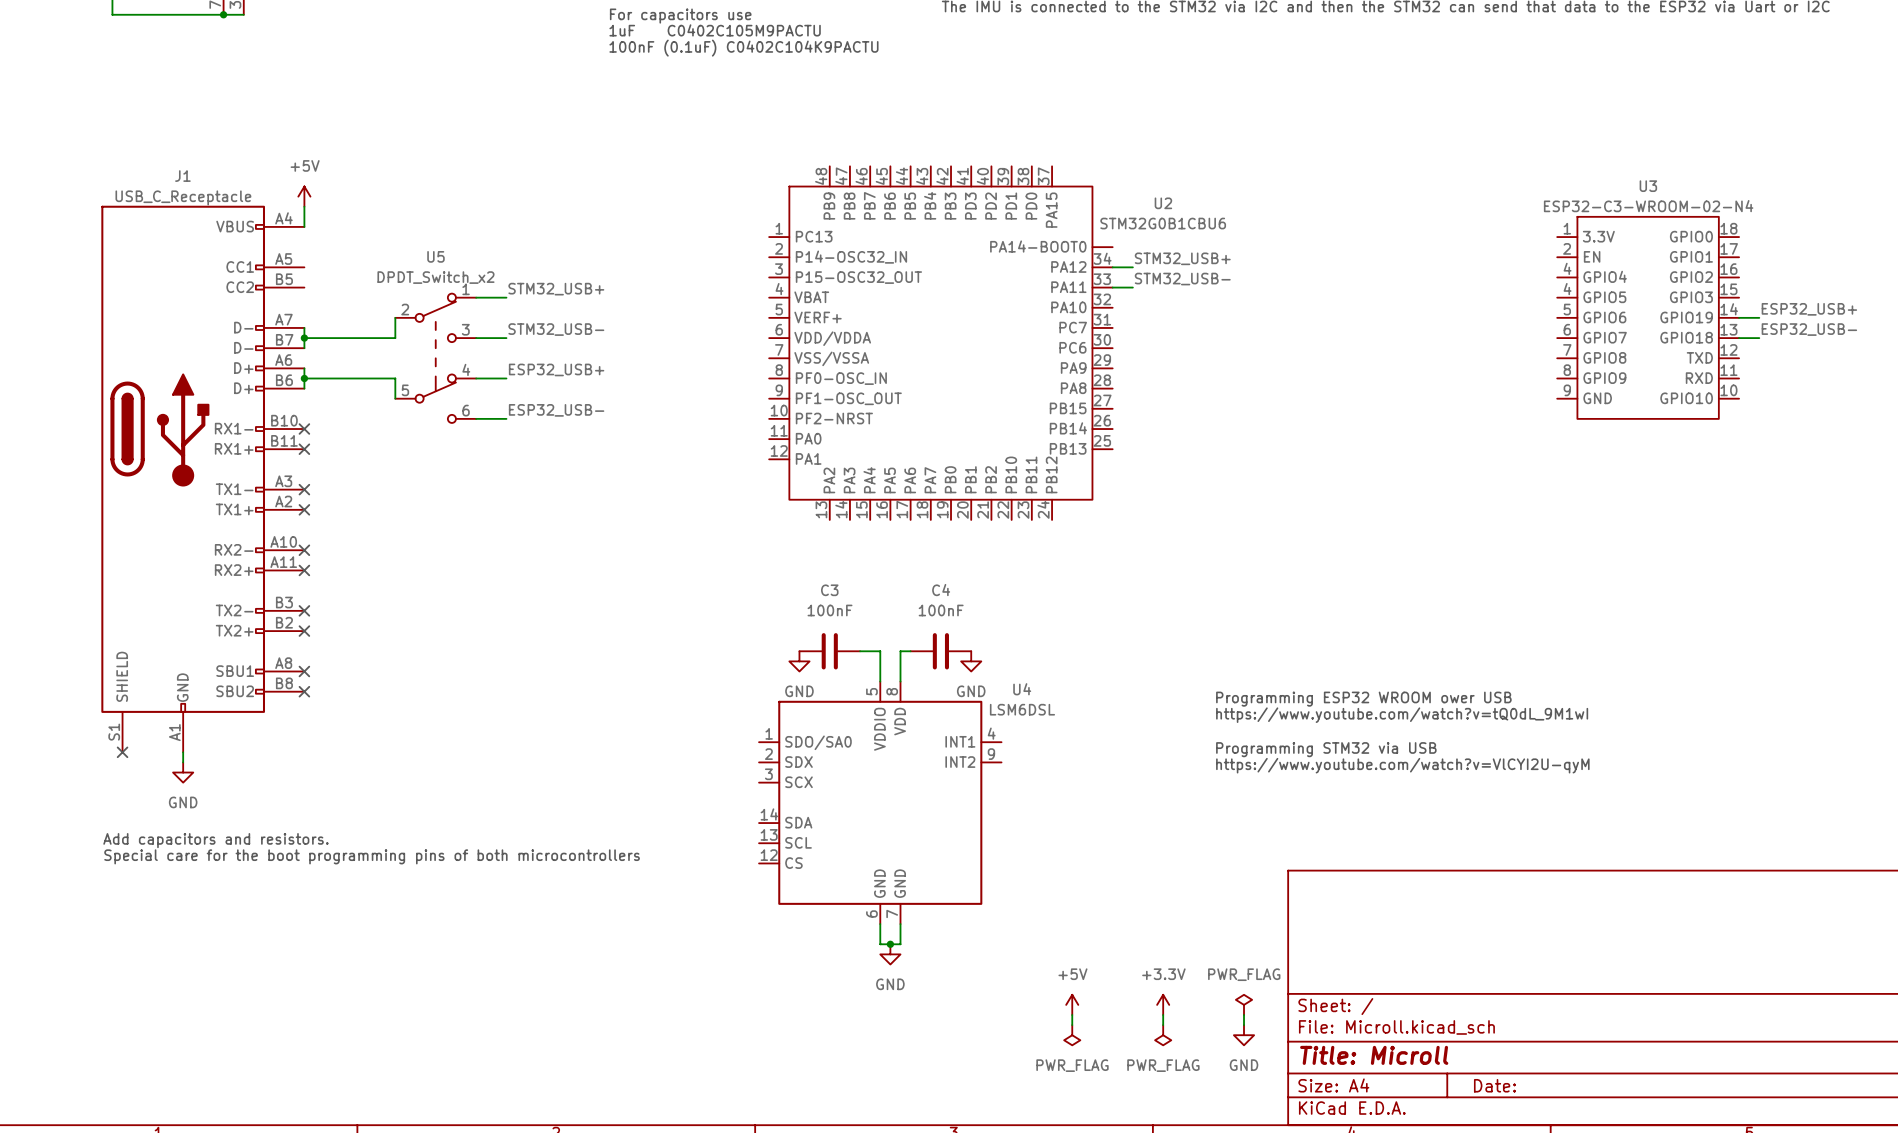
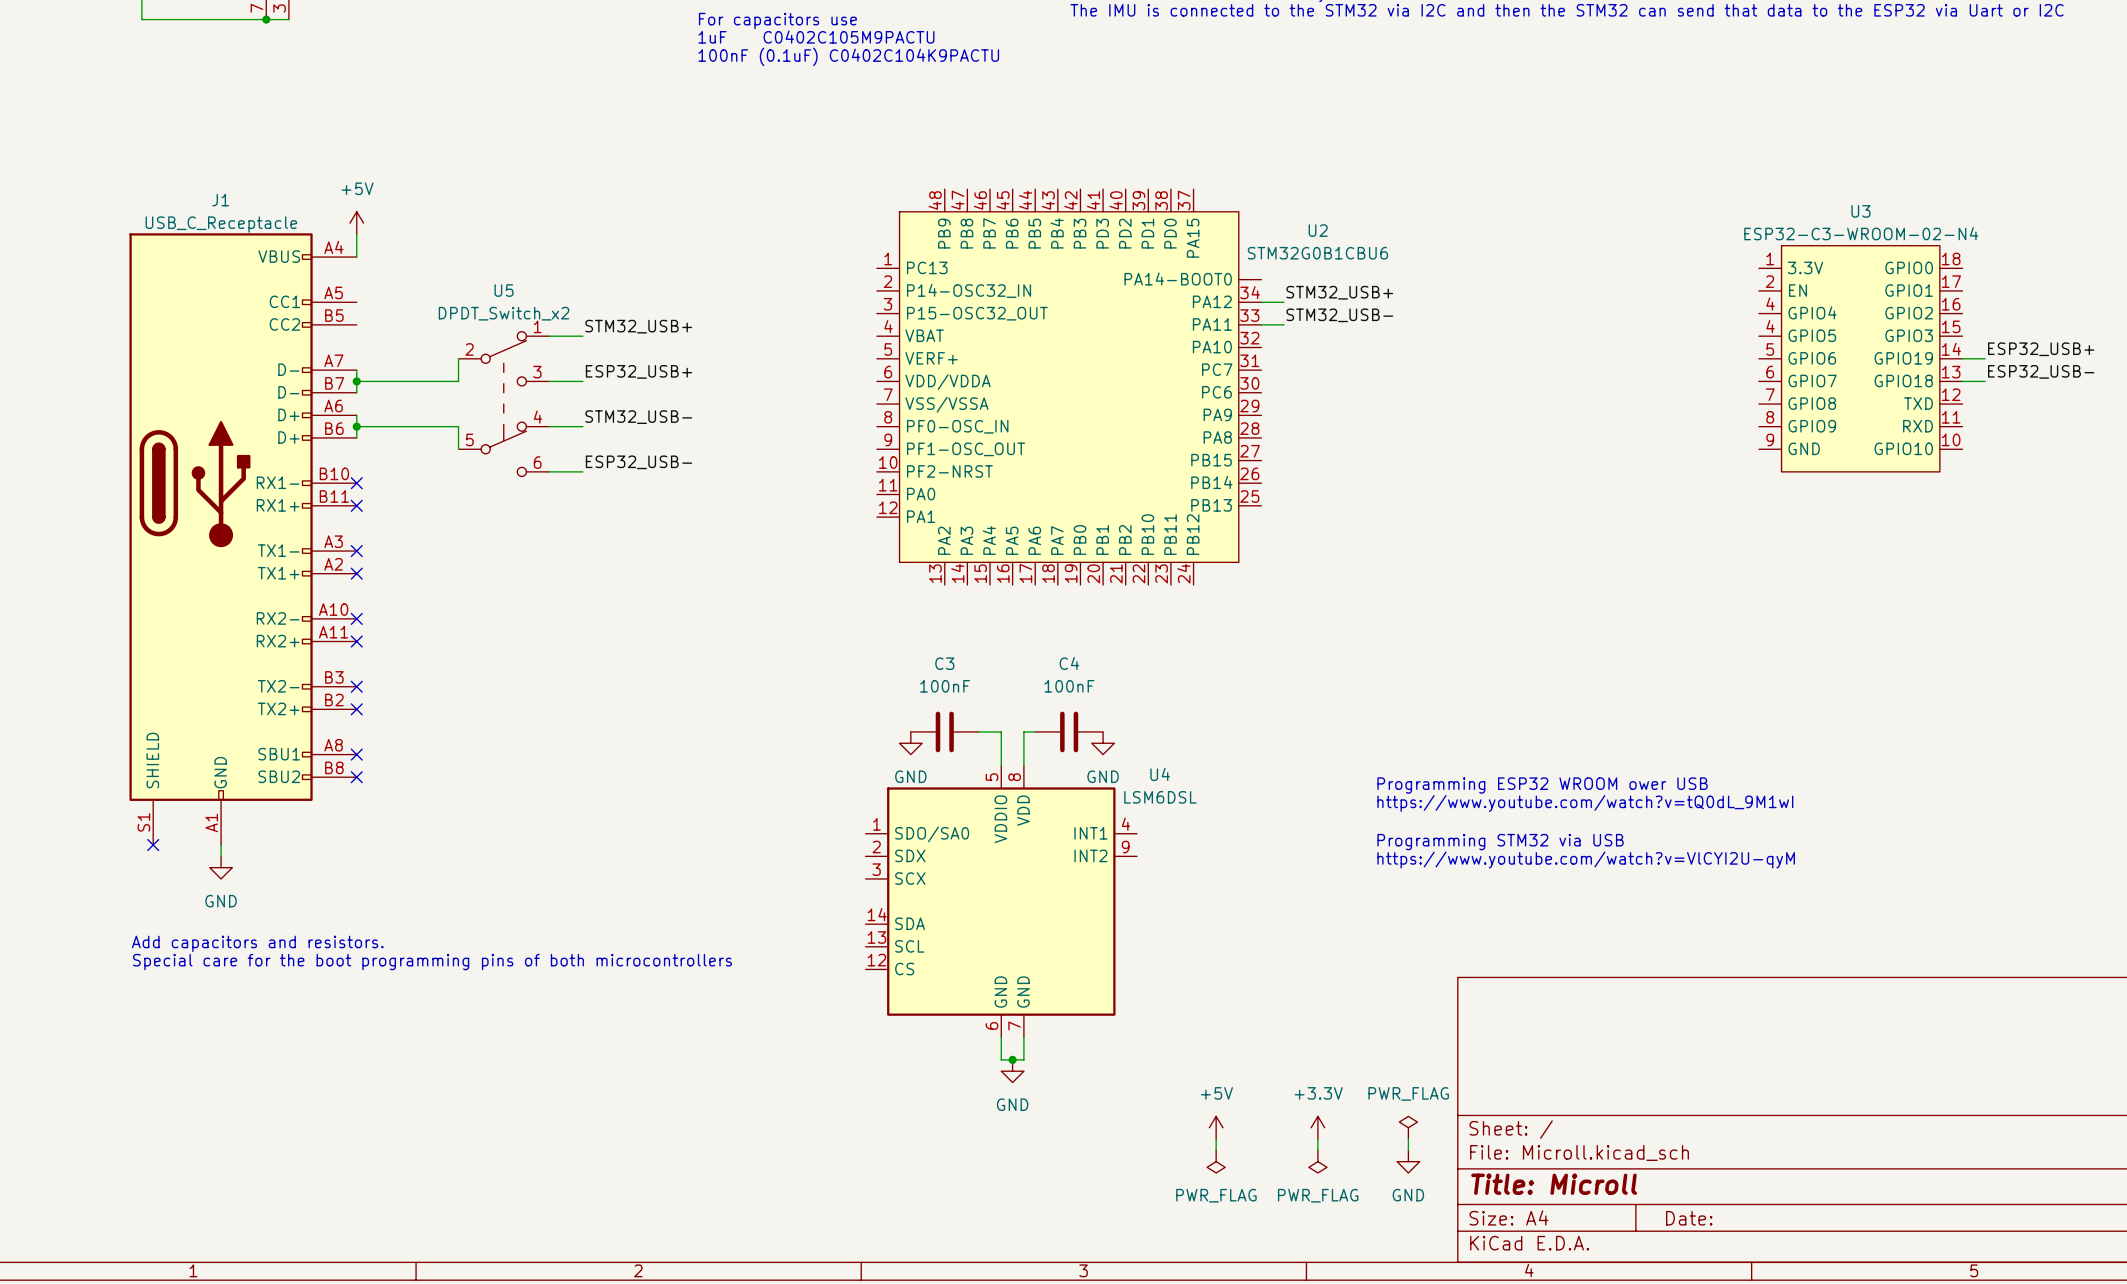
label: STM32_USB- (556, 329) -> ESP32_USB+ (639, 371)
label: ESP32_USB+ (556, 369) -> STM32_USB- (638, 417)

